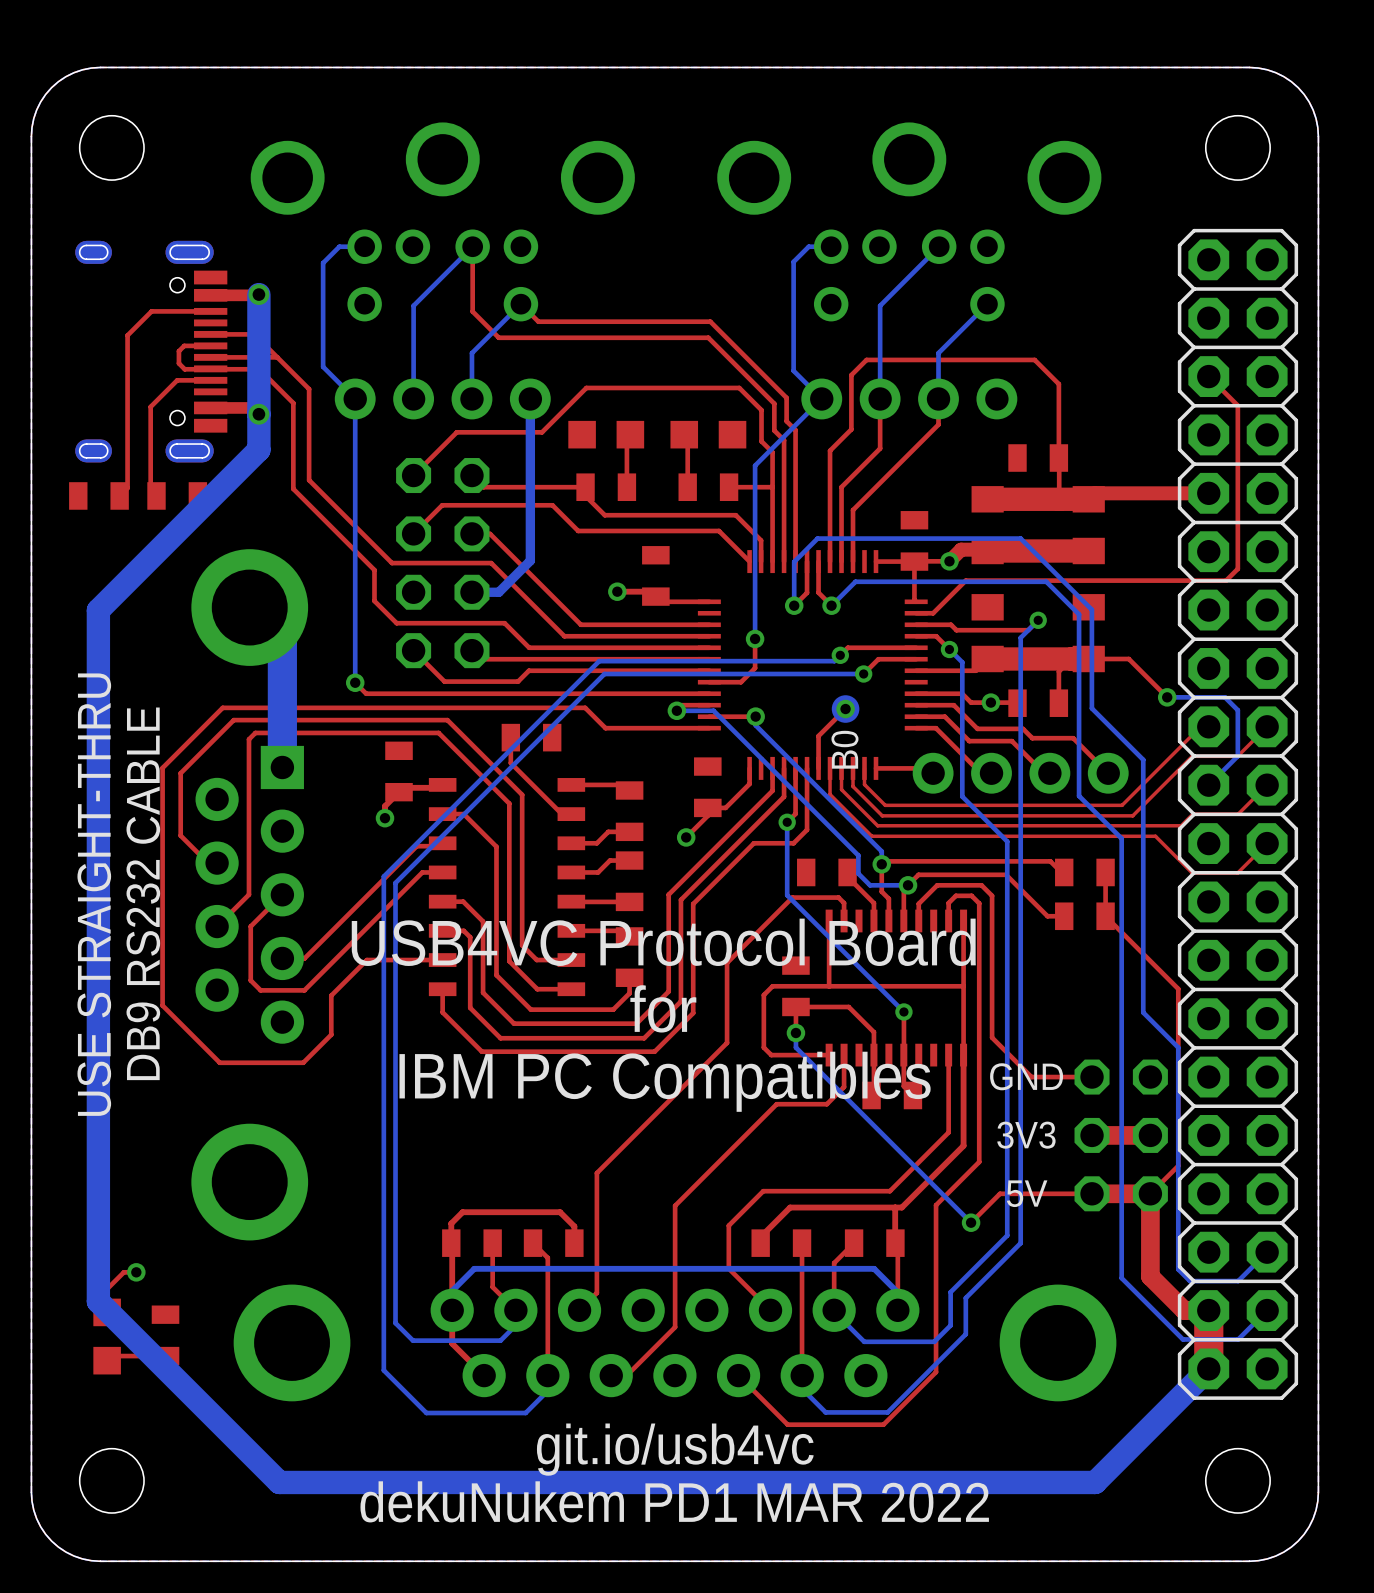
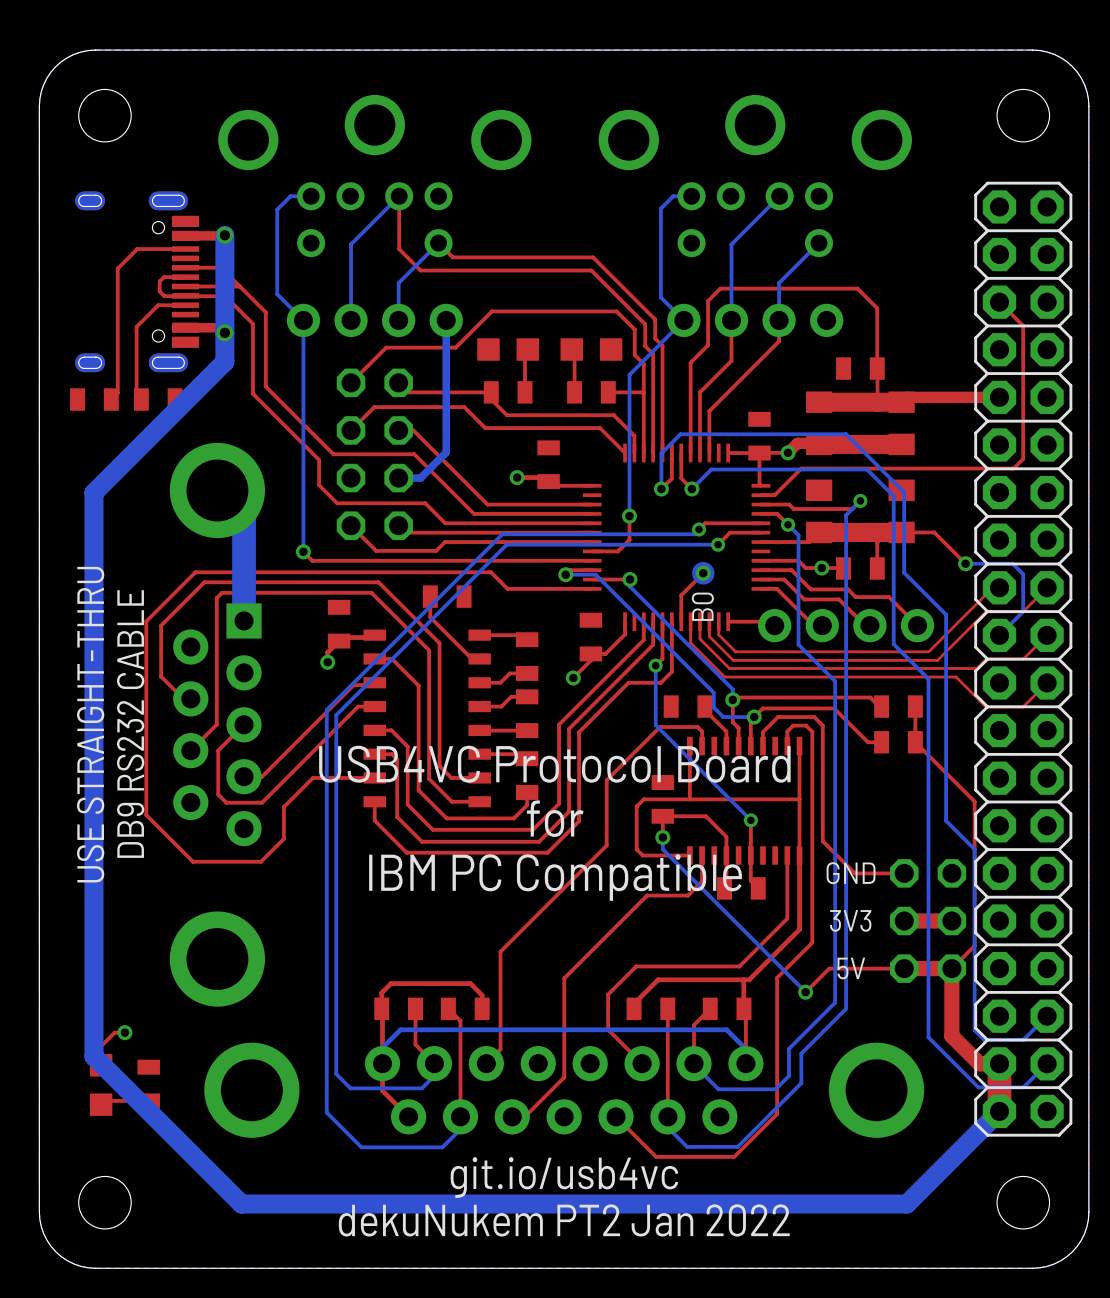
text: IBM PC Compatibles (665, 1081) -> IBM PC Compatible (555, 877)
text: dekuNukem PD1 MAR 2022 (674, 1501) -> dekuNukem PT2 Jan 2022 (564, 1220)

